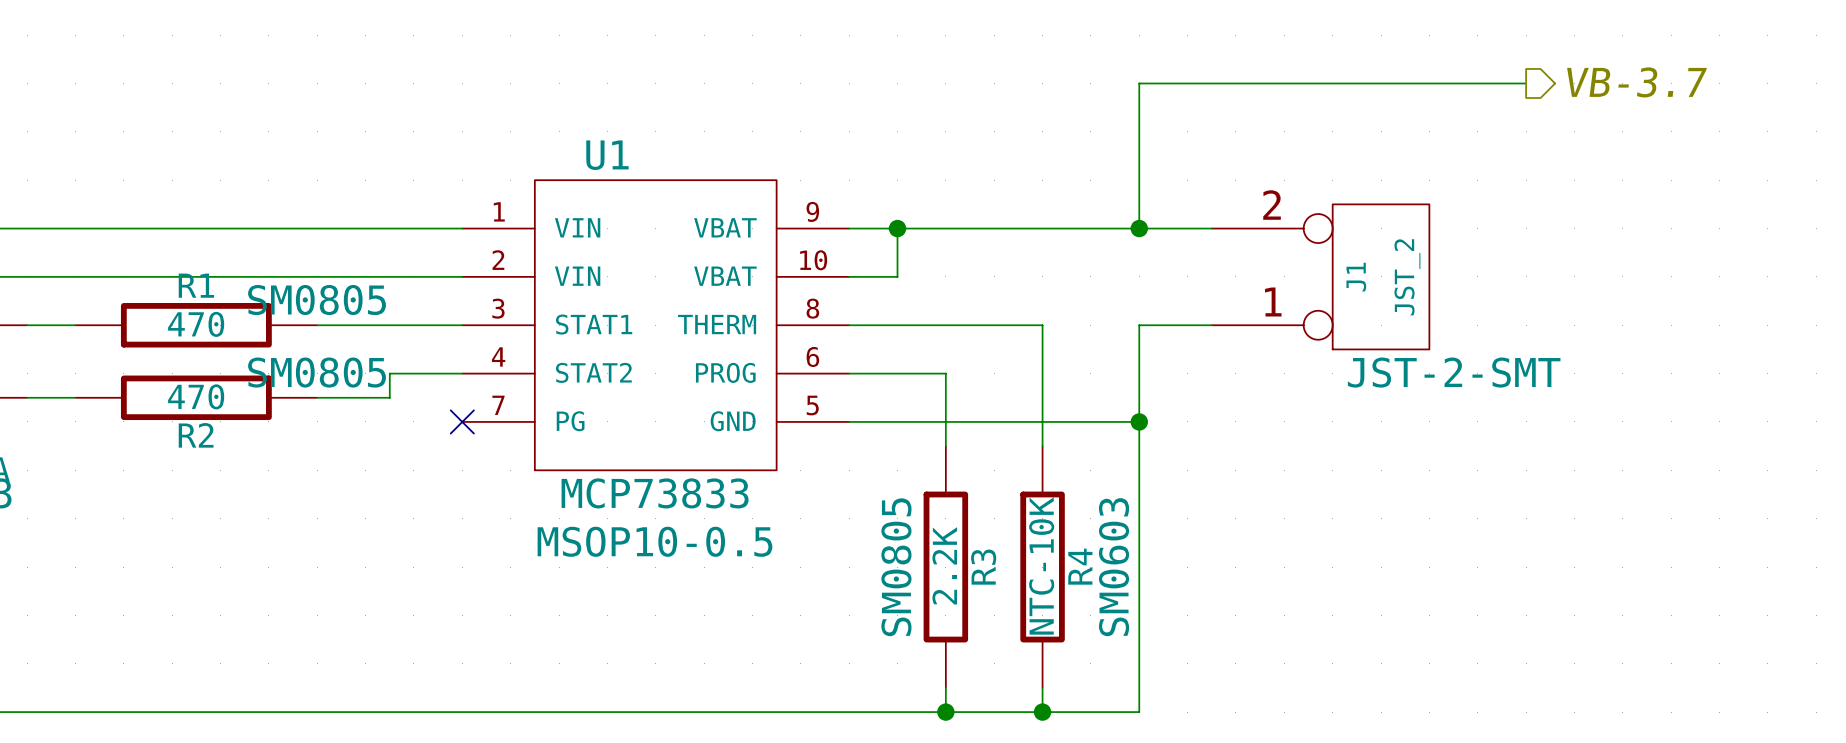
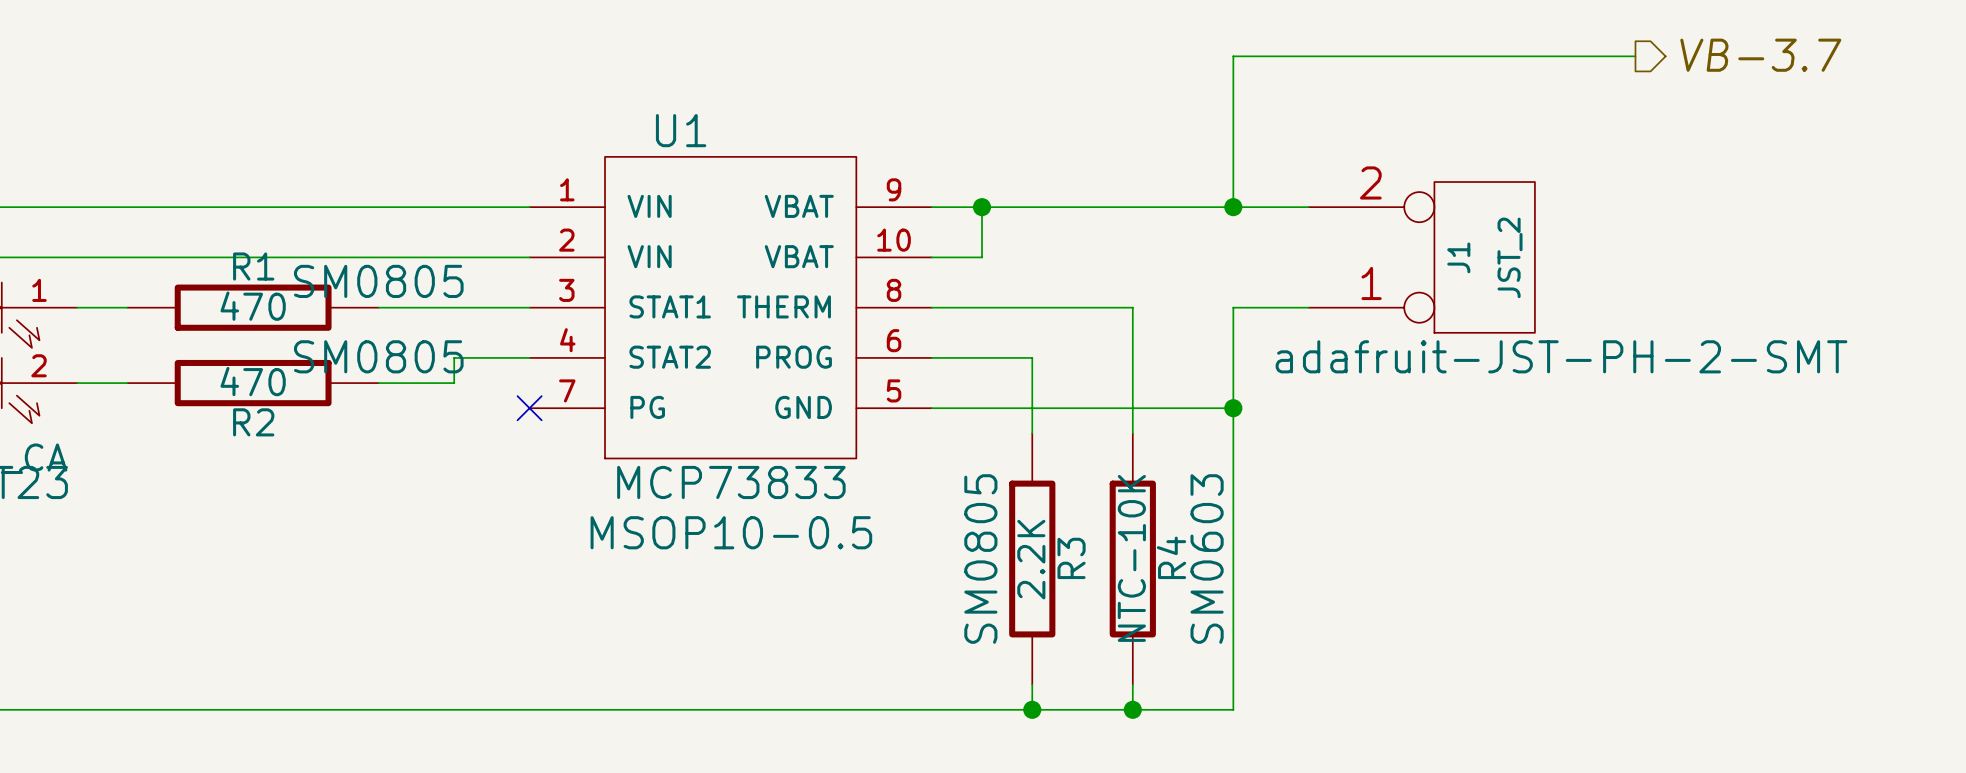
J1 text: JST-2-SMT (1454, 372) -> adafruit-JST-PH-2-SMT (1561, 356)

